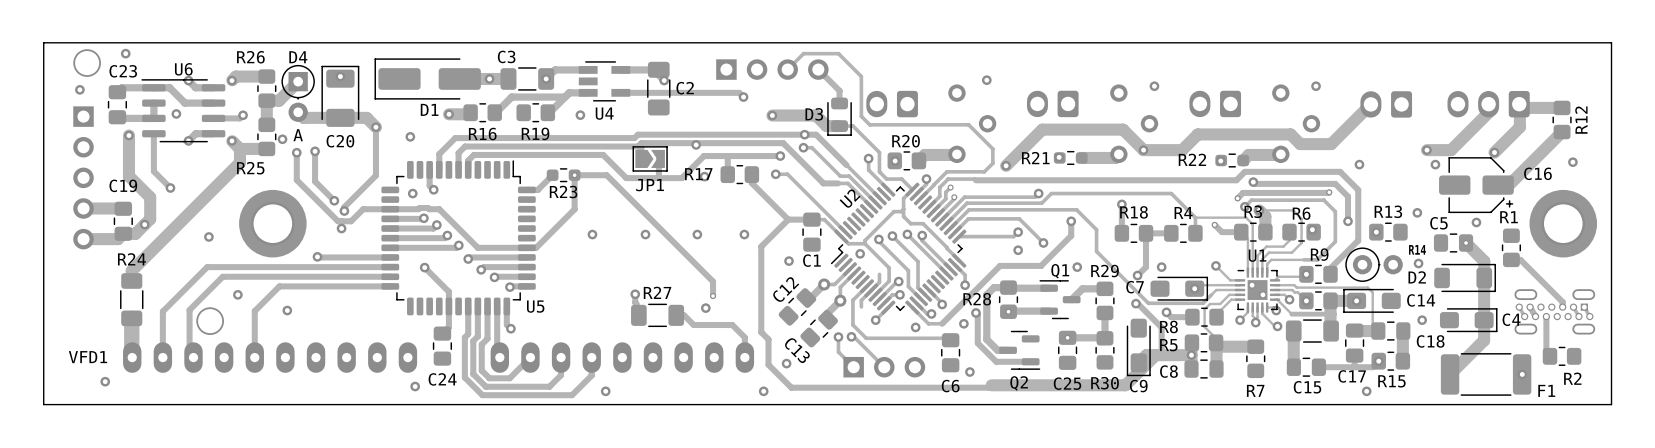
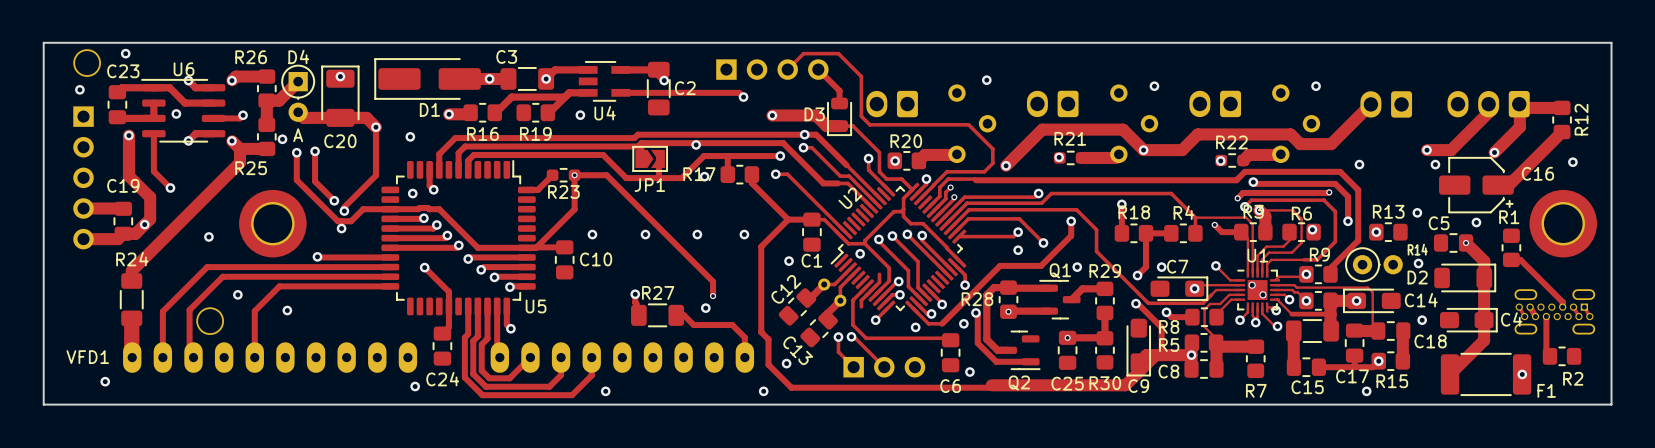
R21 name position: R21 (1035, 158) -> R21 (1070, 138)
R22 name position: R22 (1192, 159) -> R22 (1231, 142)
track: none -> (536, 247) (564, 247)
C10: none -> (564, 259)
C7 name position: C7 (1135, 287) -> C7 (1177, 266)

